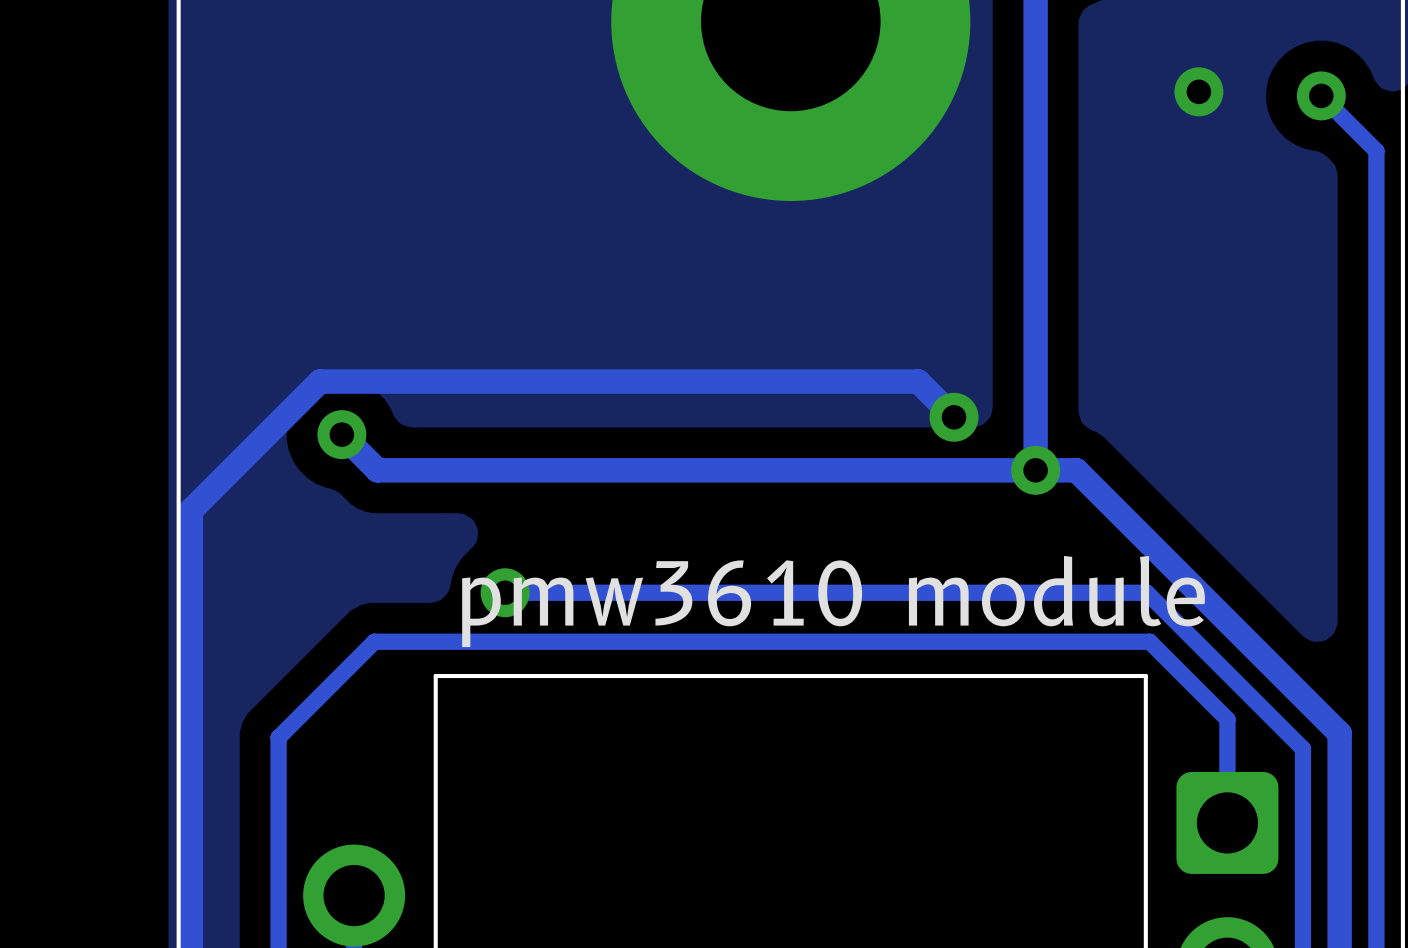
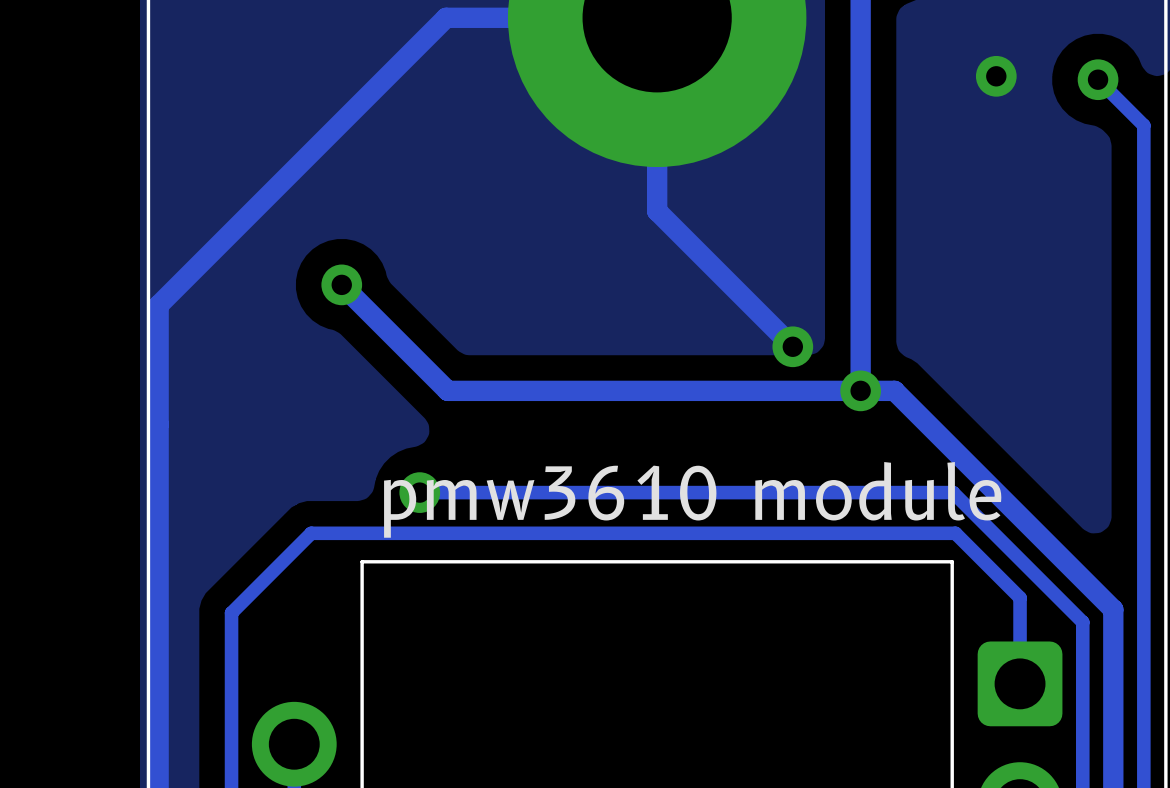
track: (918, 381) (319, 381) (190, 510) -> (763, 317) (657, 211) (657, 17) (446, 17) (158, 305) (158, 424)
track: (341, 434) (377, 470) (538, 470) -> (341, 284) (447, 390)
via position: (341, 434) -> (341, 284)

